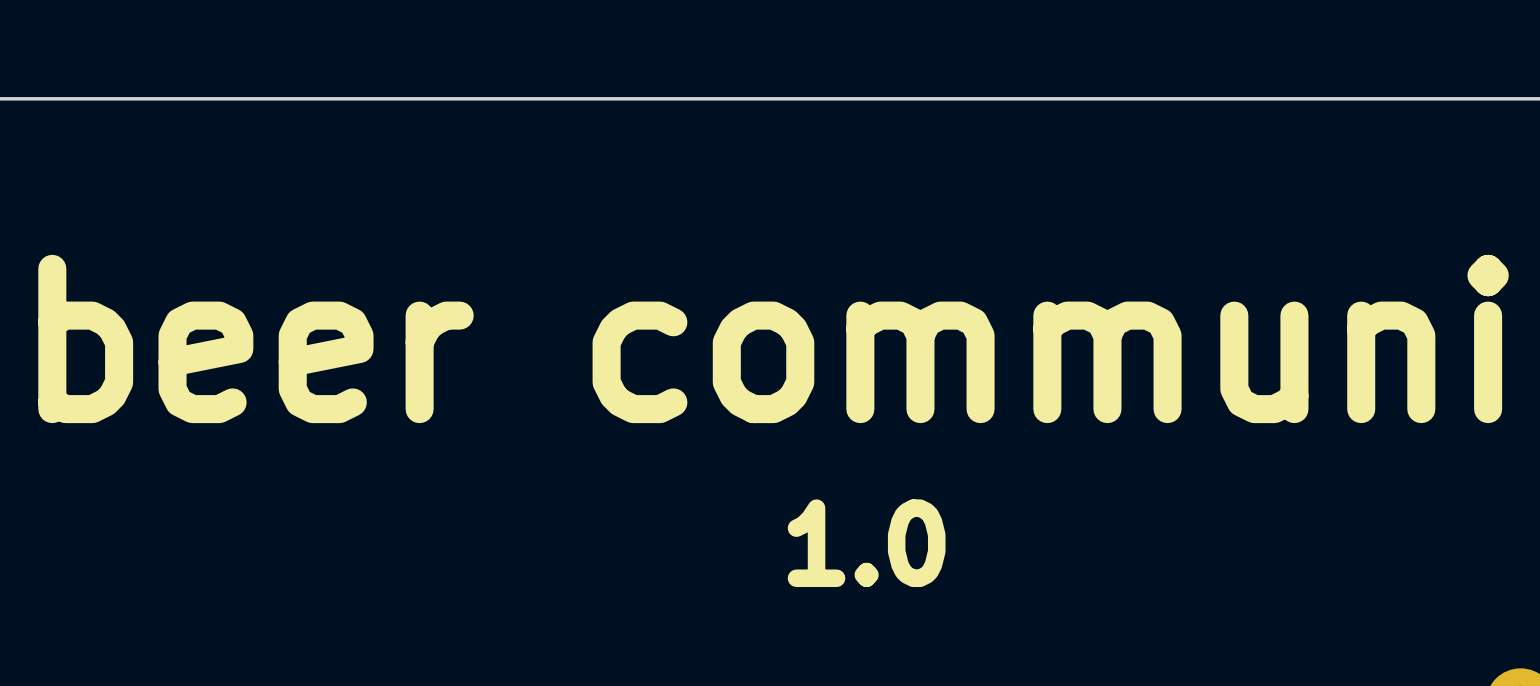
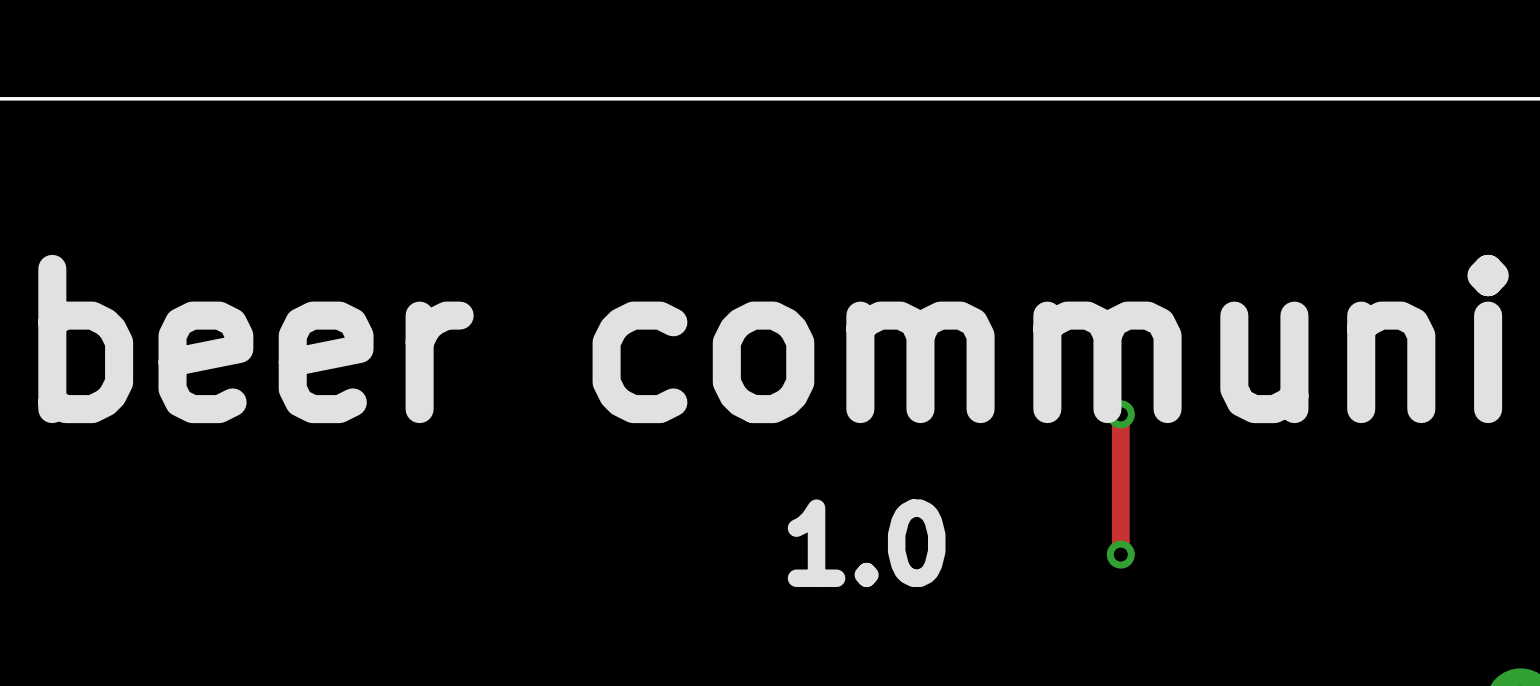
track: none -> (1120, 414) (1120, 554)
via: none -> (1120, 414)
via: none -> (1120, 554)

